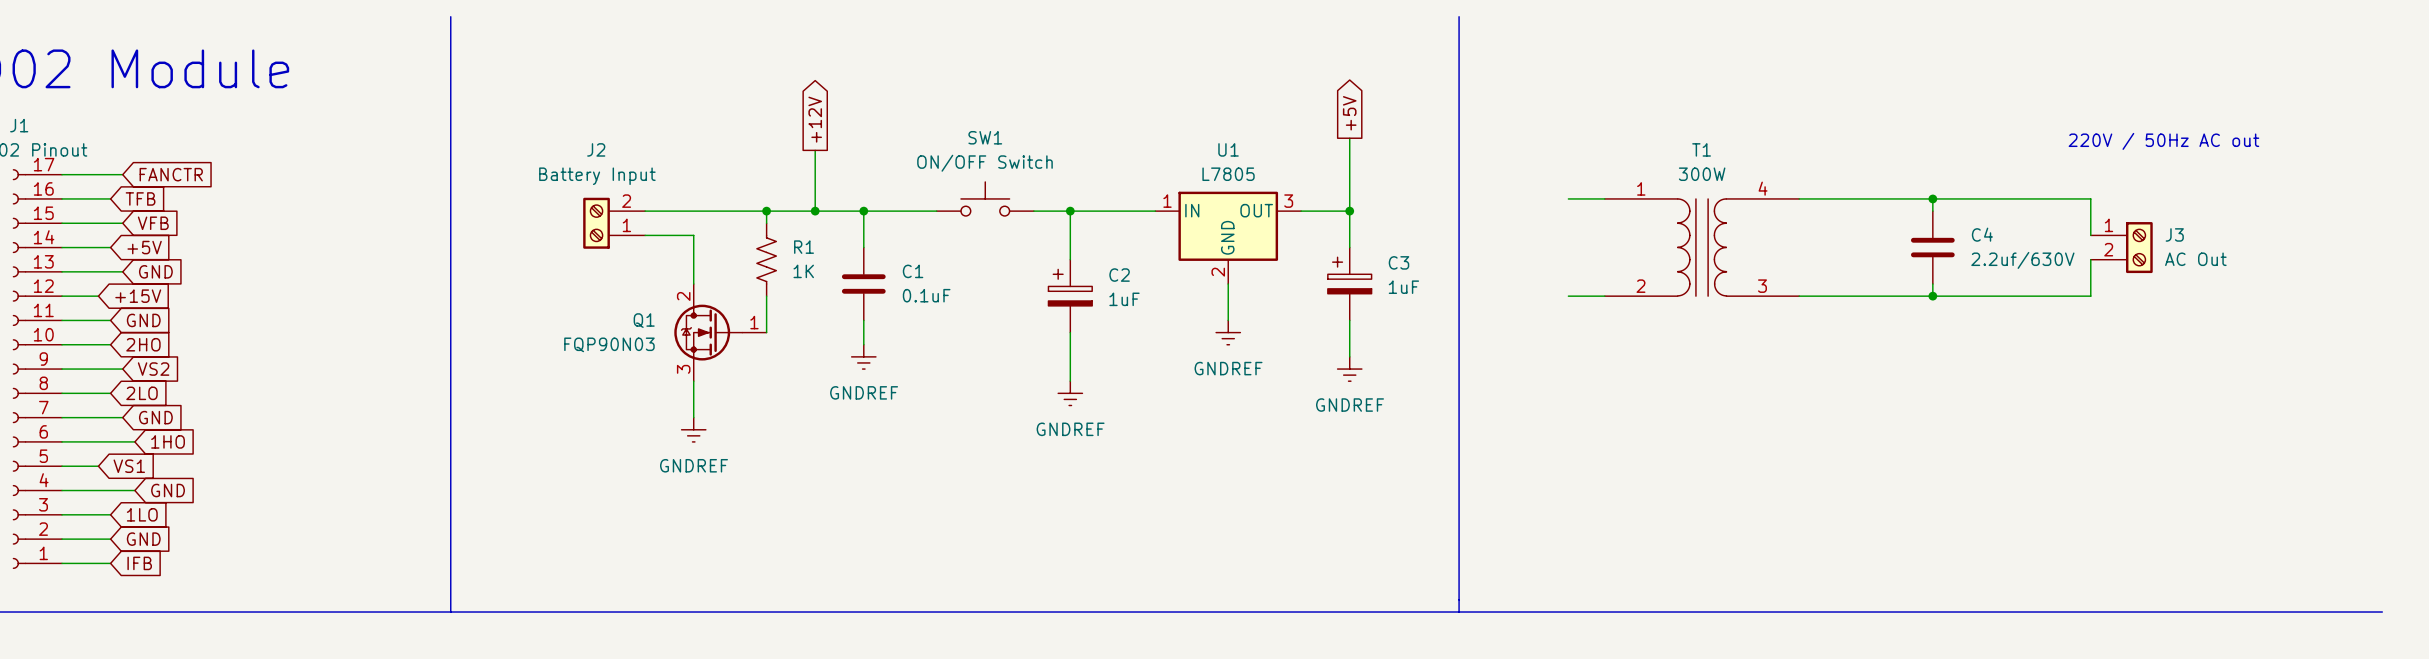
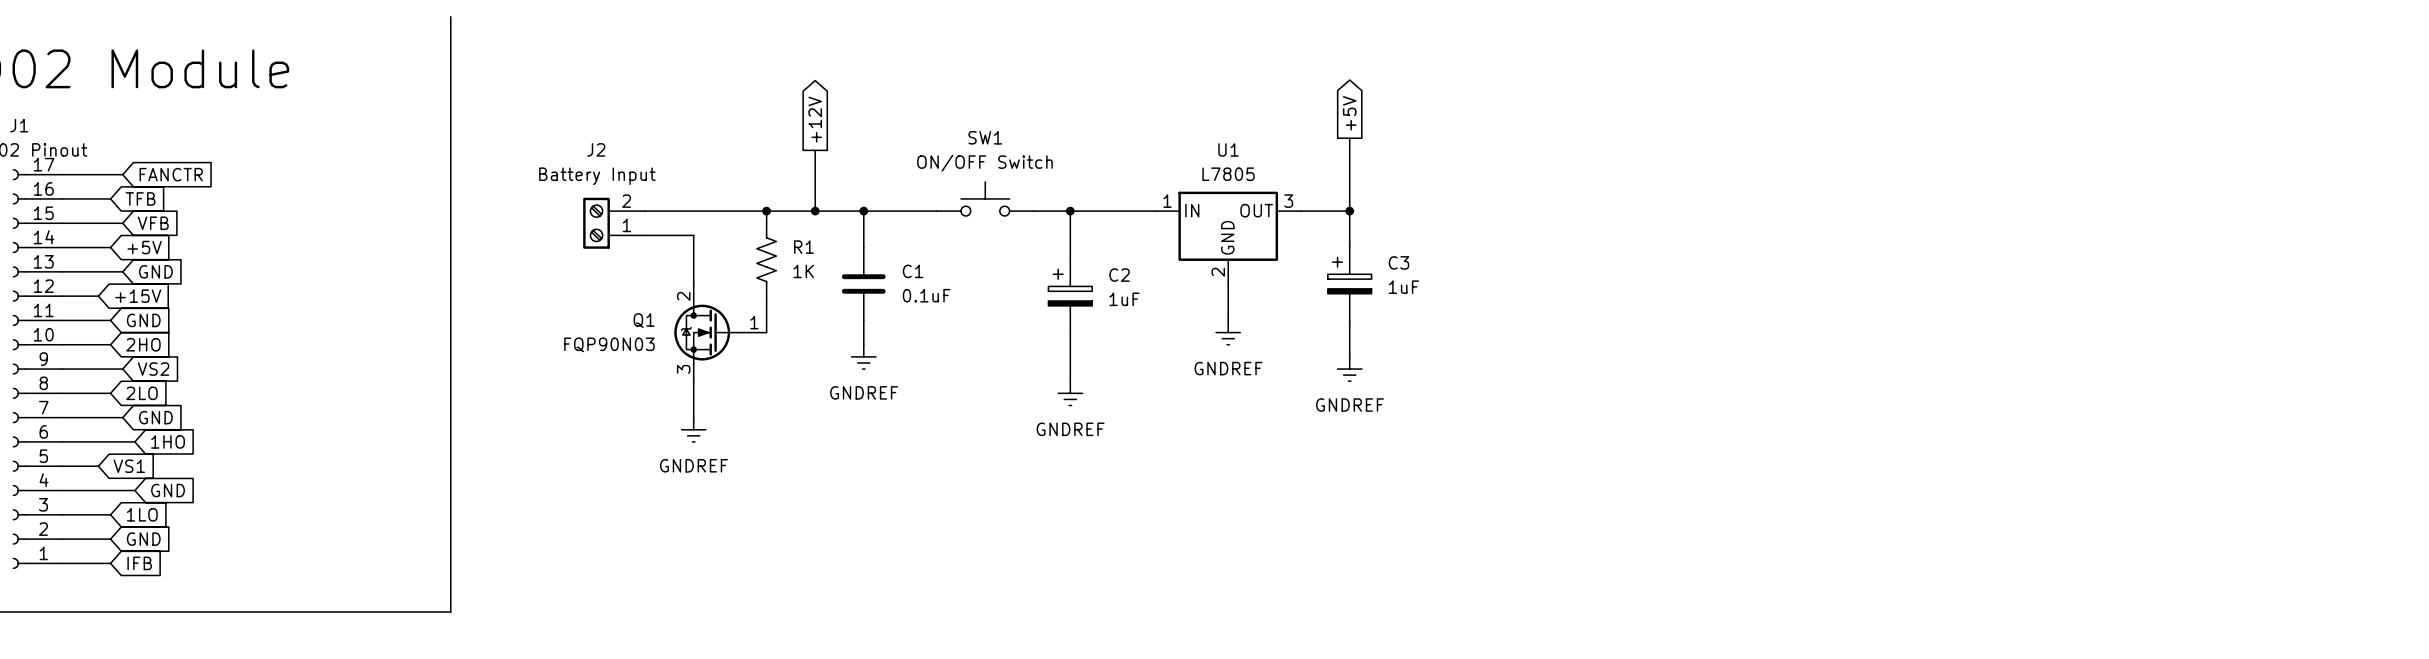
line: (1459, 16) (1459, 612) -> none
text: 220V / 50Hz AC out (2163, 141) -> none
wire: (1568, 198) (1604, 198) -> none
wire: (1799, 198) (2090, 198) (2090, 235) -> none
wire: (1932, 198) (1932, 211) -> none
junction: (1932, 198) -> none
T1: 300W (1702, 247) -> none
C4: 2.2uf/630V (1932, 247) -> none
J3: AC Out (2121, 247) -> none
wire: (2090, 259) (2090, 296) (1799, 296) -> none
wire: (1932, 284) (1932, 296) -> none
wire: (1568, 296) (1604, 296) -> none
junction: (1932, 296) -> none
line: (450, 612) (2382, 612) -> none

